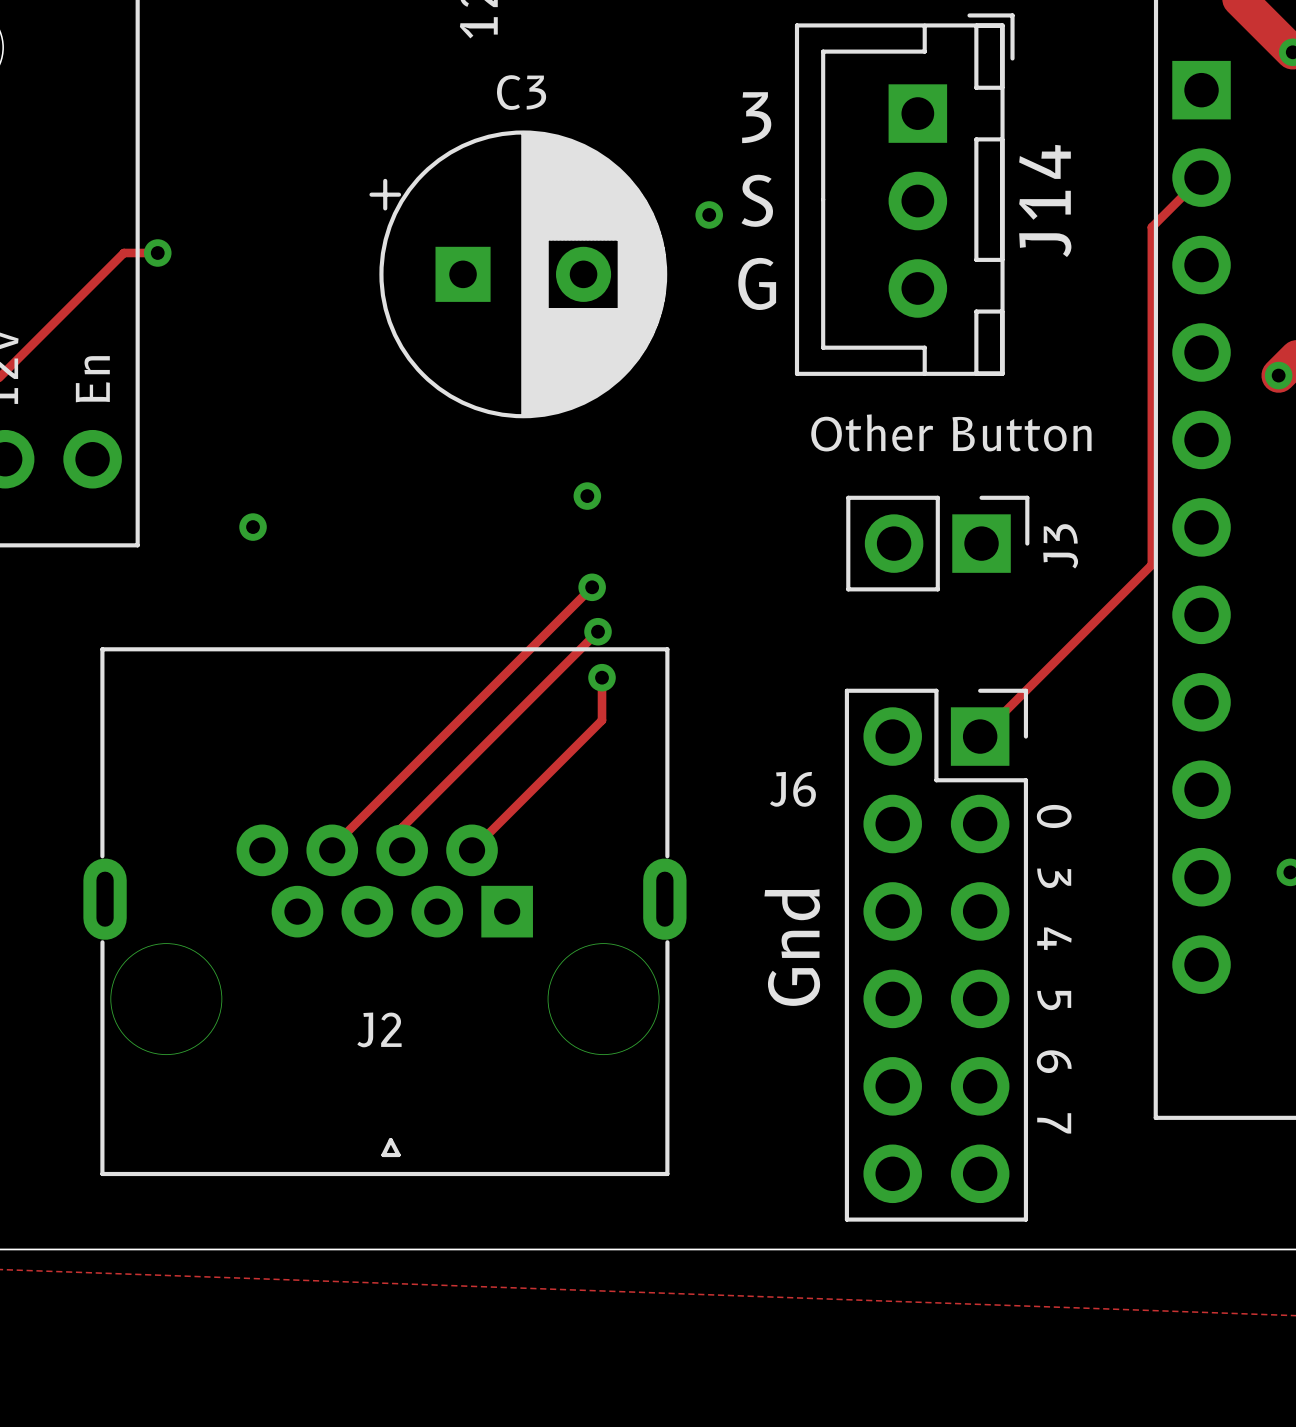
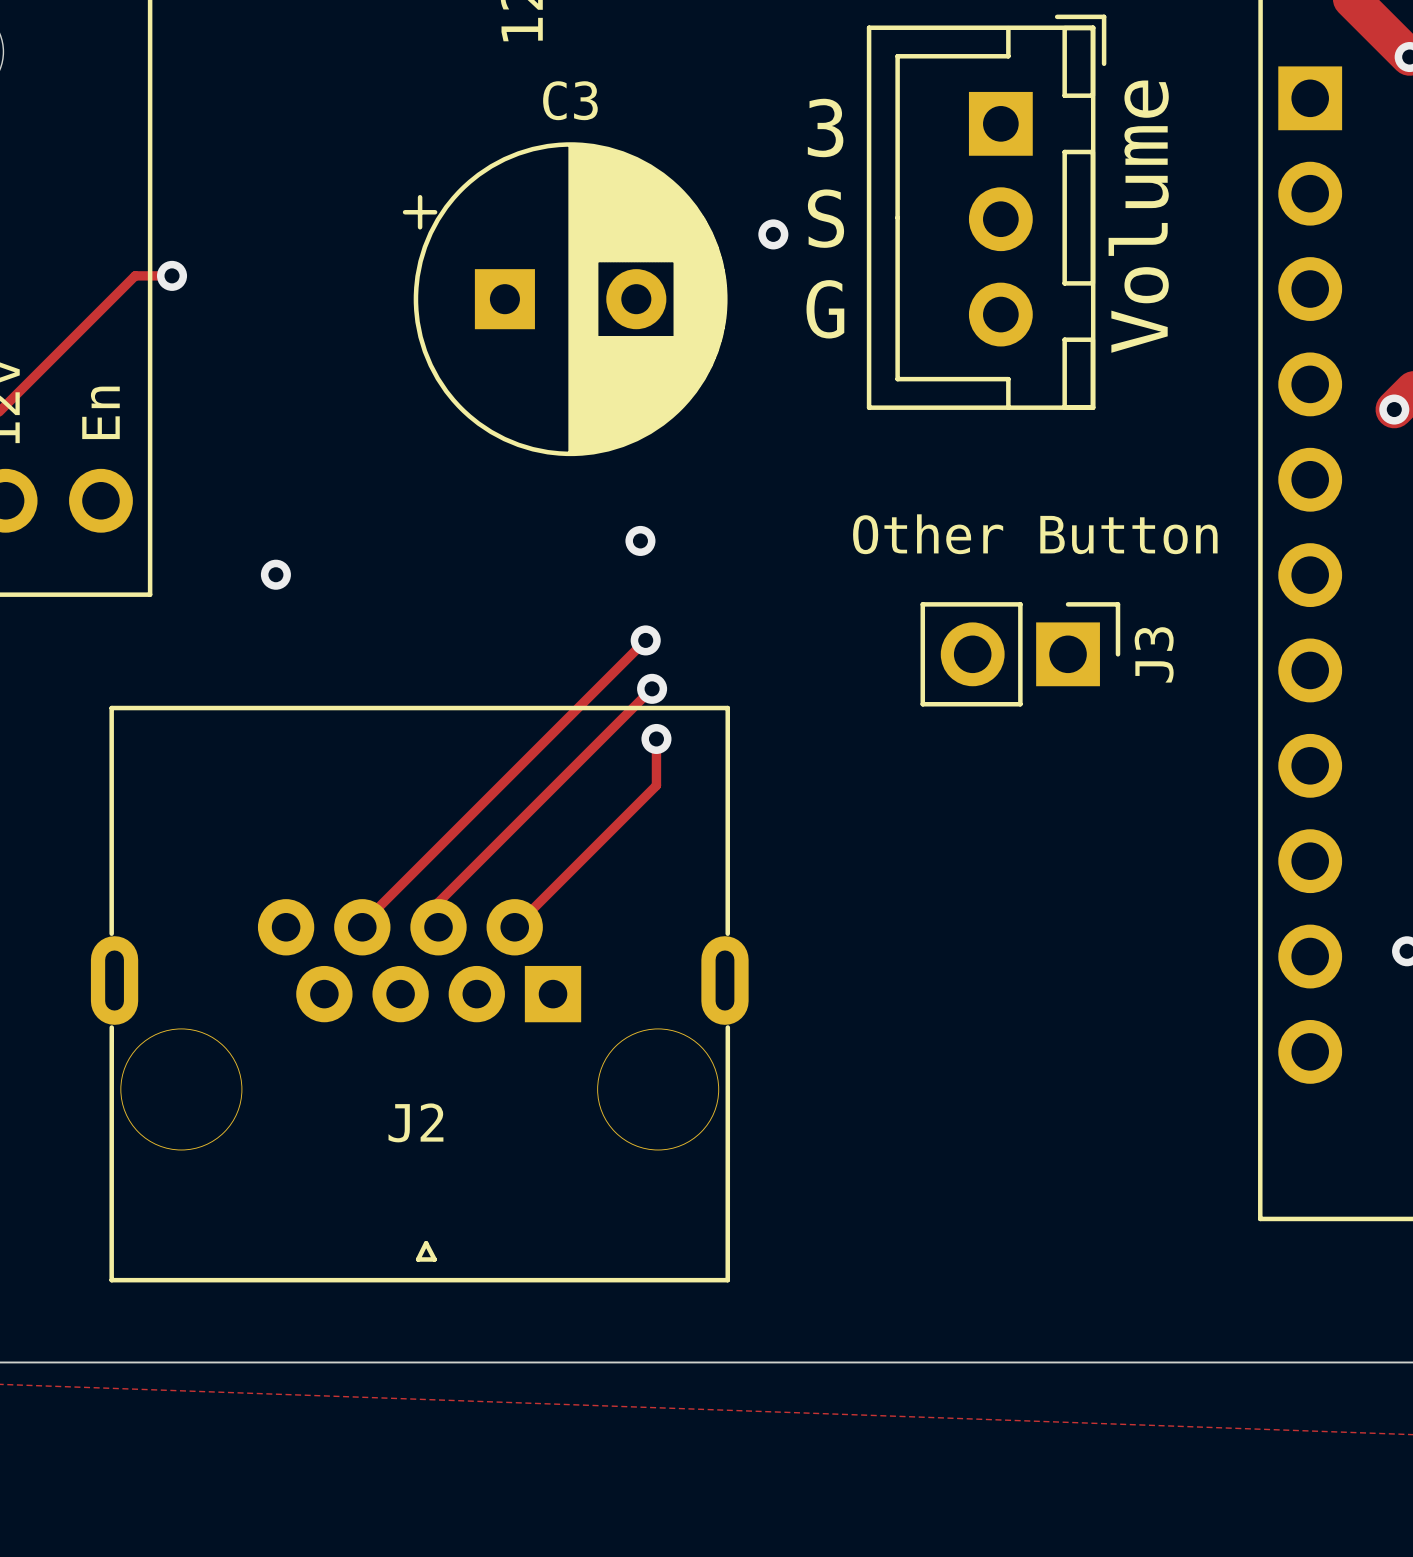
track: (1201, 177) (1151, 227) (1151, 564) (980, 736) -> none
J14 name: J14 (1045, 200) -> Volume (1138, 216)
J3 position: (937, 543) -> (1020, 654)
text: Gnd (792, 947) -> none
J6: (936, 955) -> none
text: 0 3 4 5 6 7 (1054, 969) -> none

